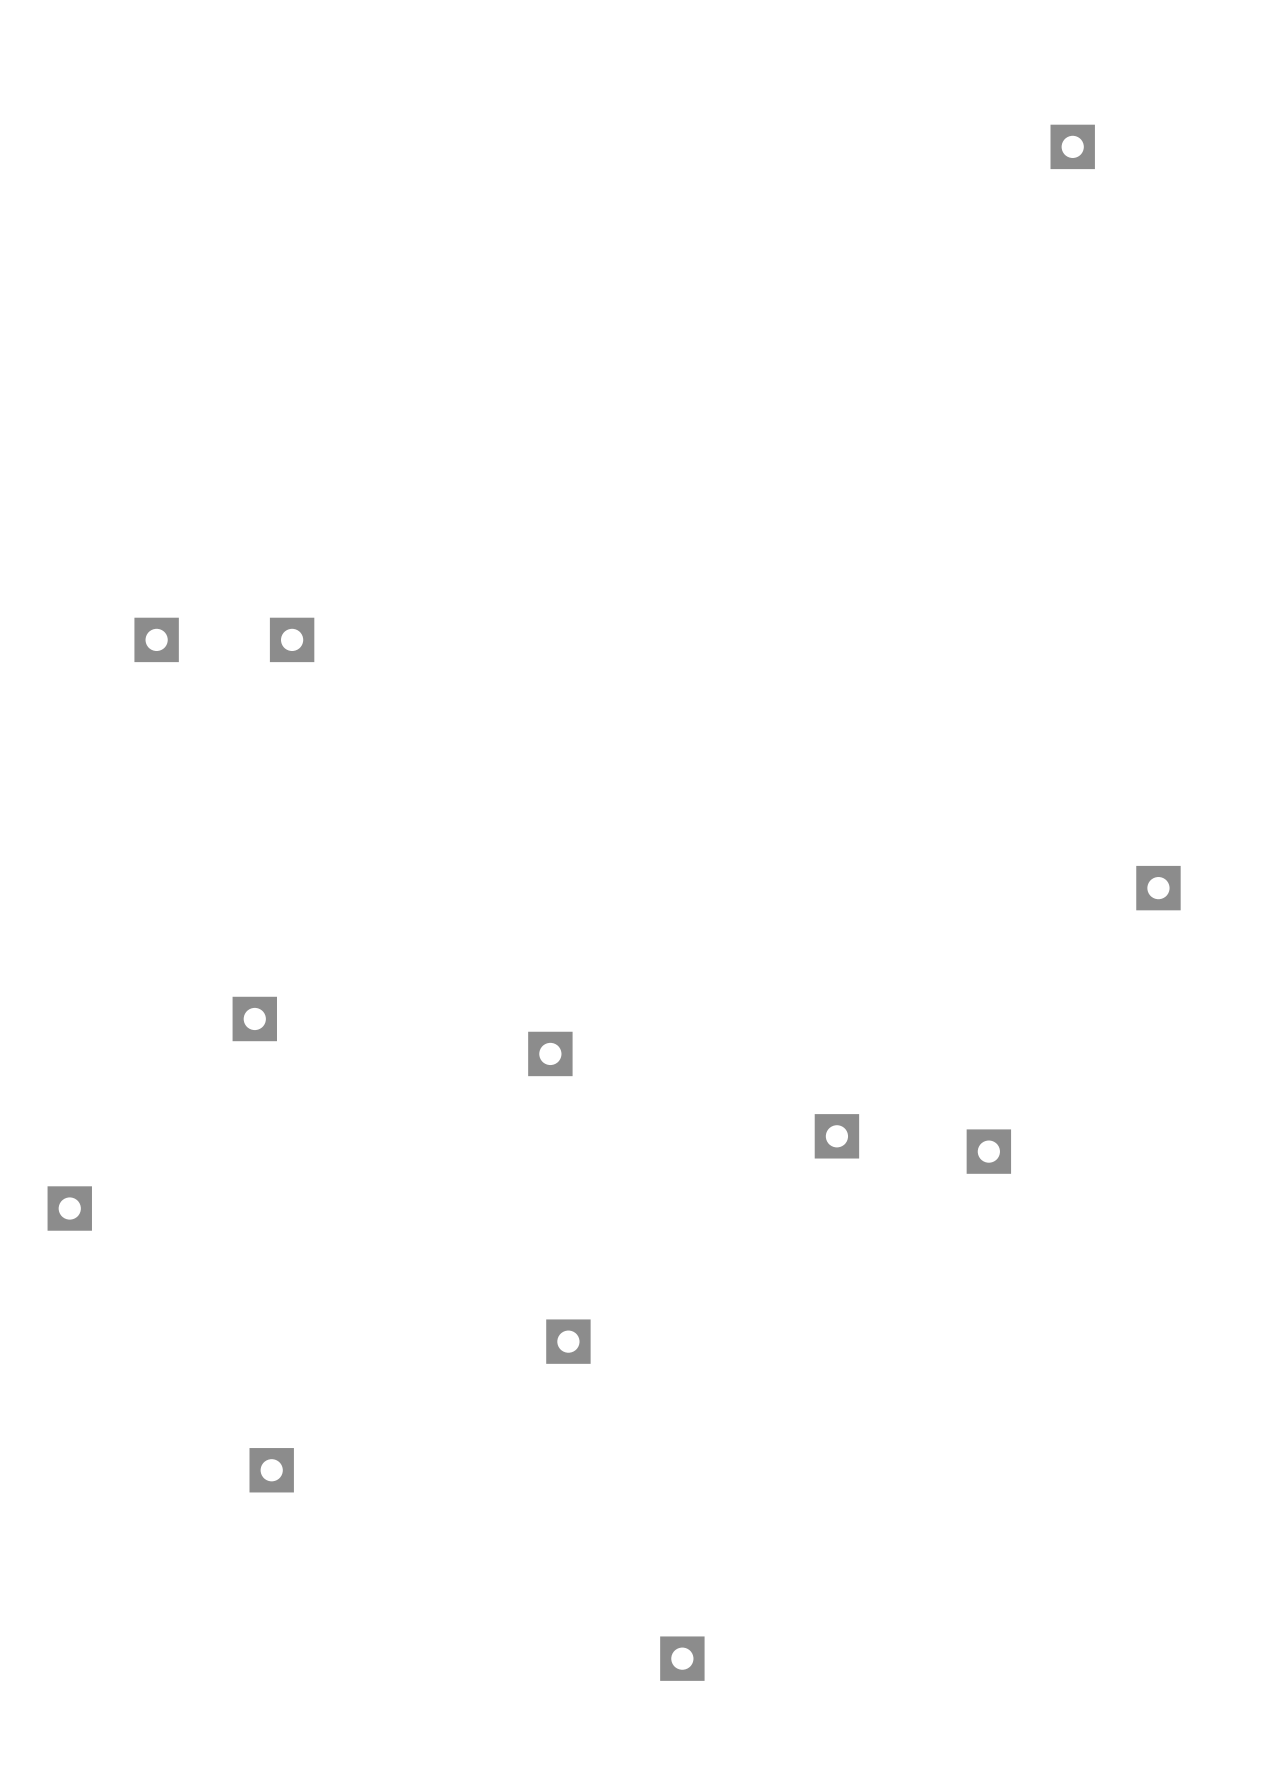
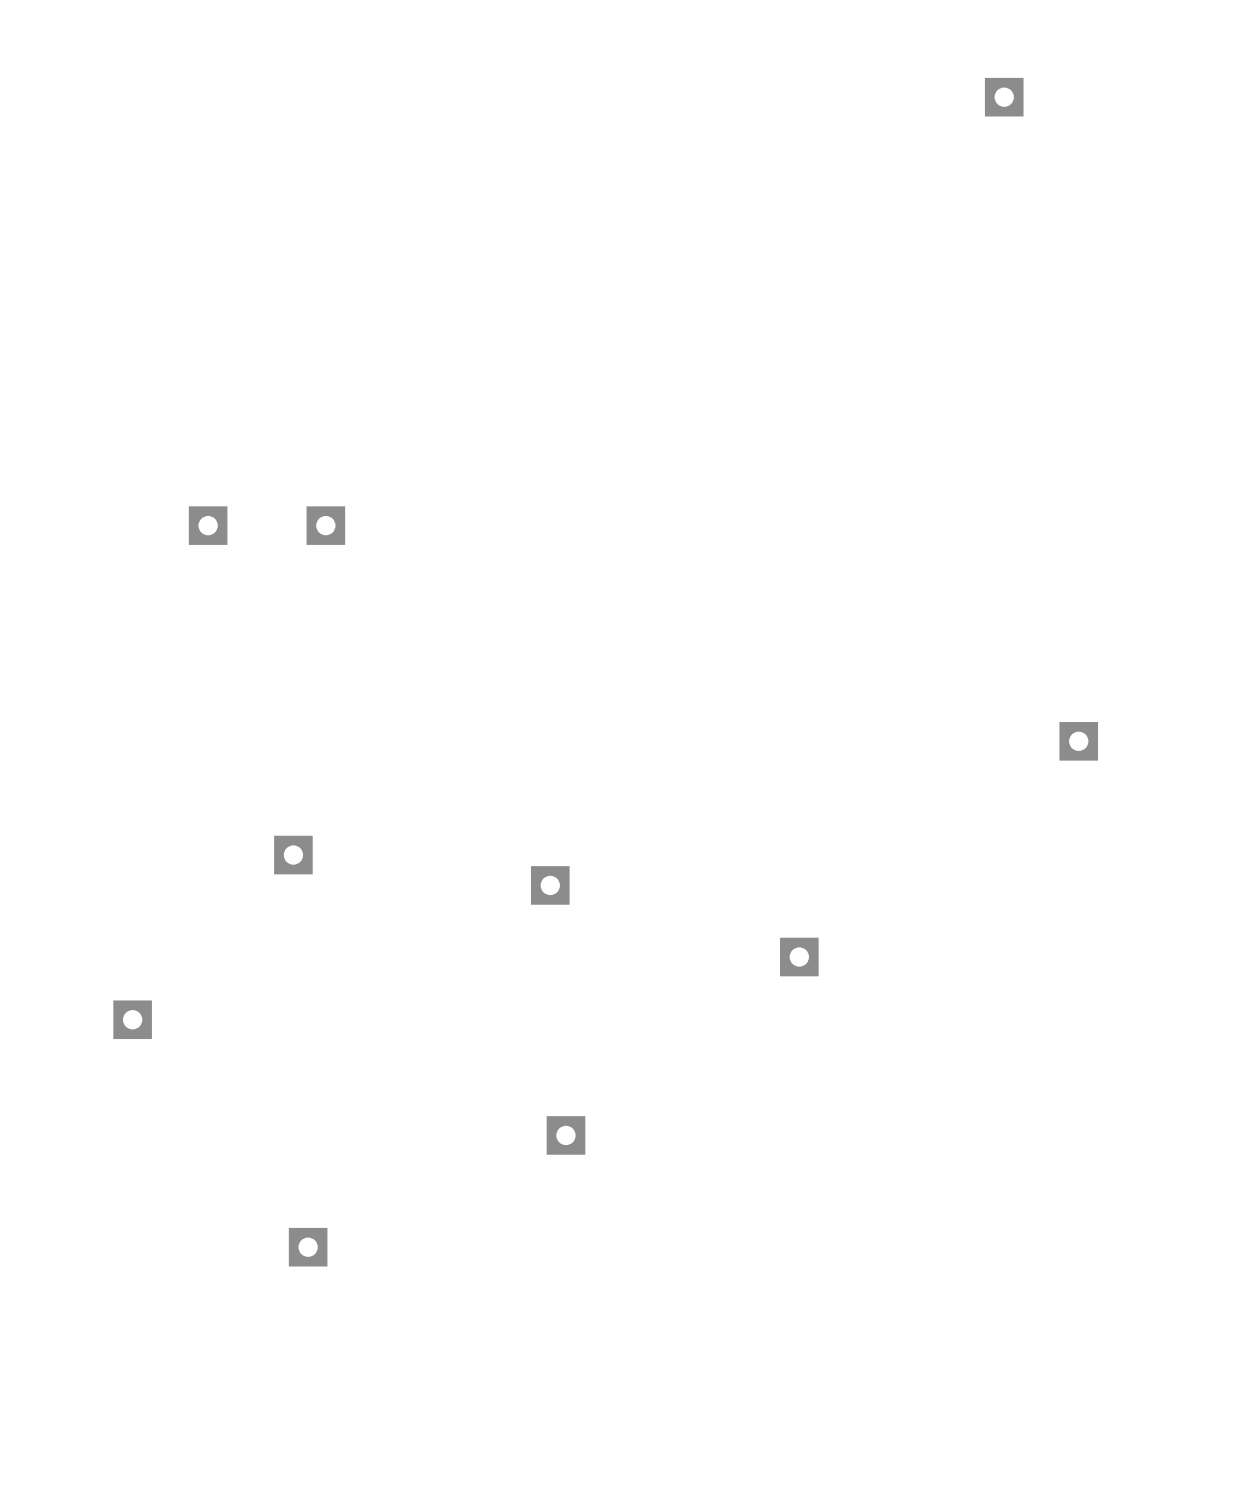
part: (988, 1151) -> none
part: (682, 1658) -> none

